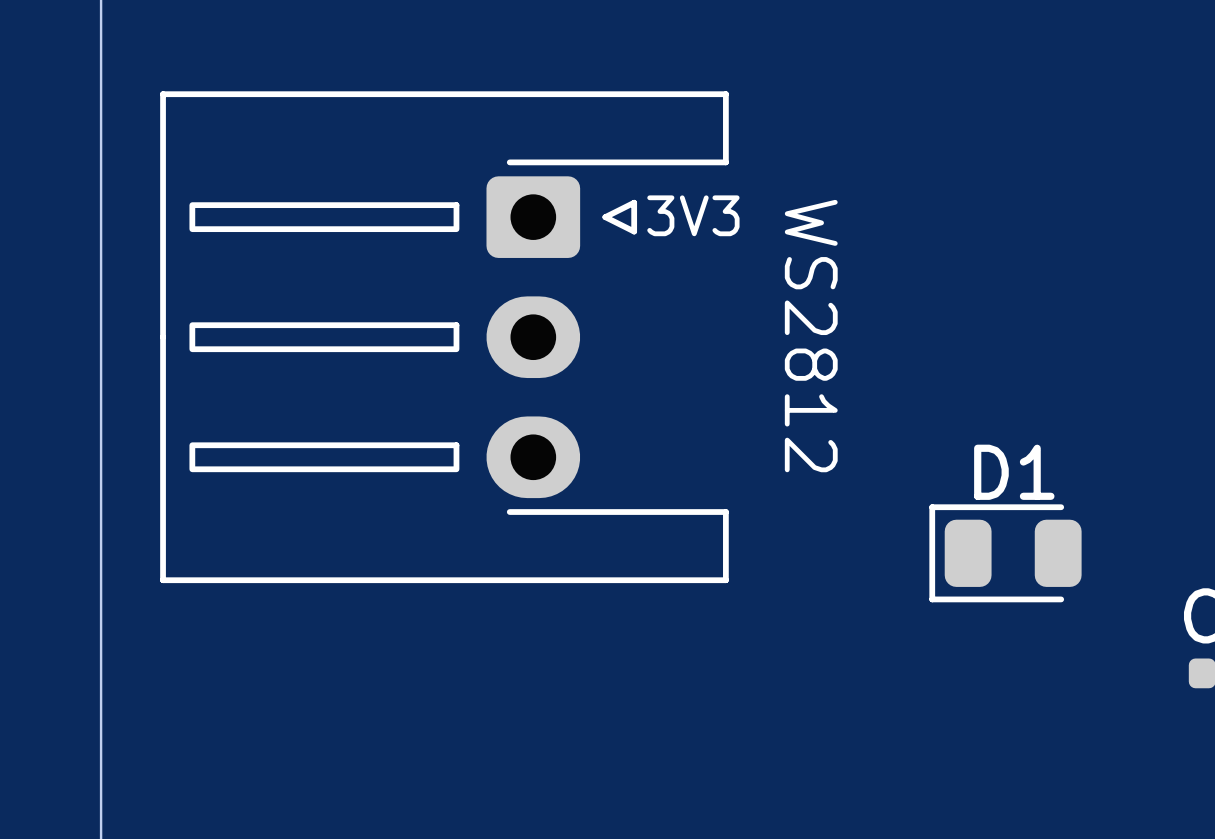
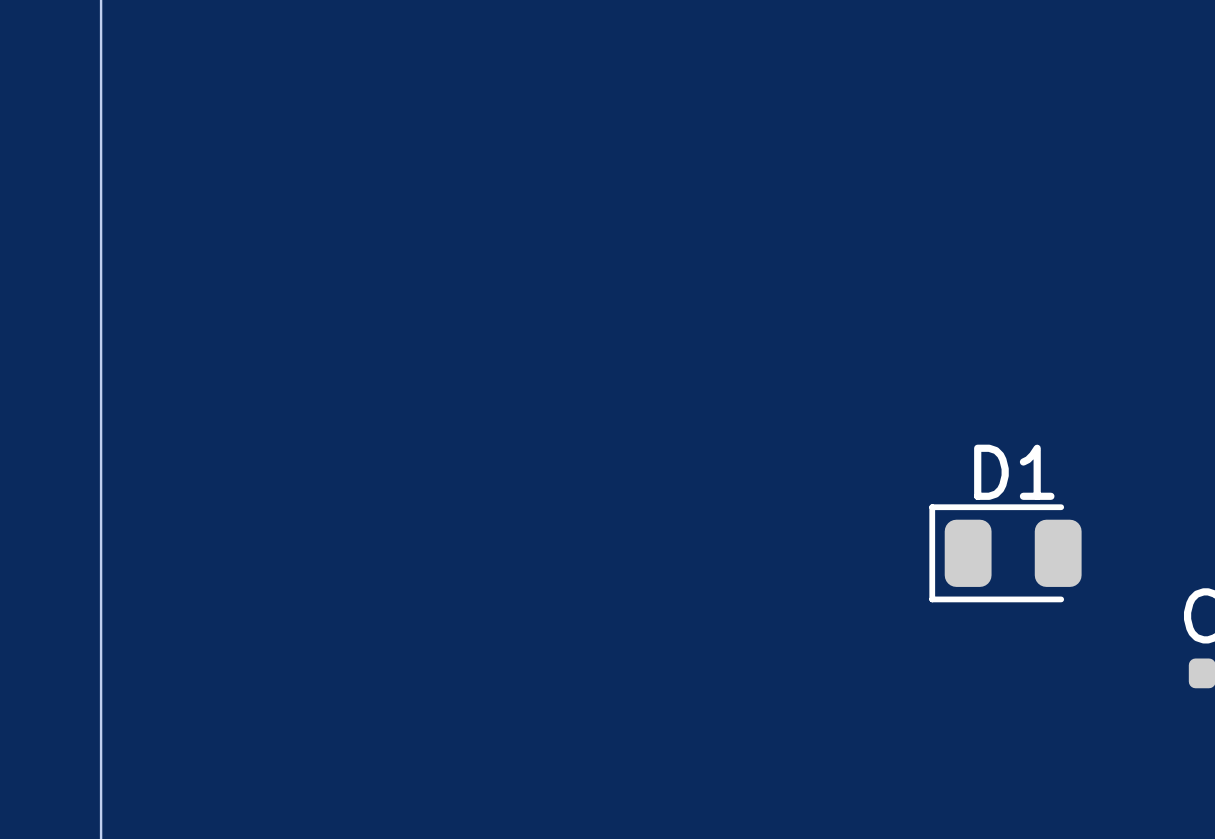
text: 3V3 (693, 215) -> none
text: WS2812 (811, 336) -> none
part: (444, 337) -> none

